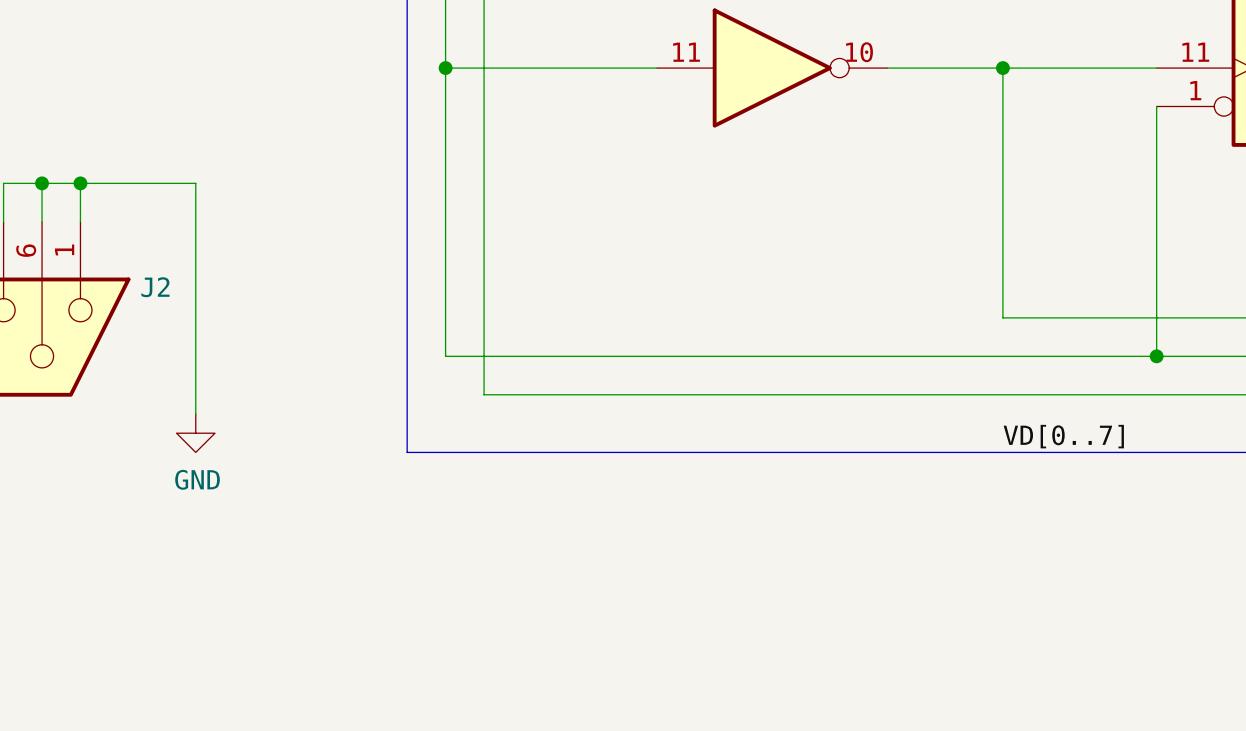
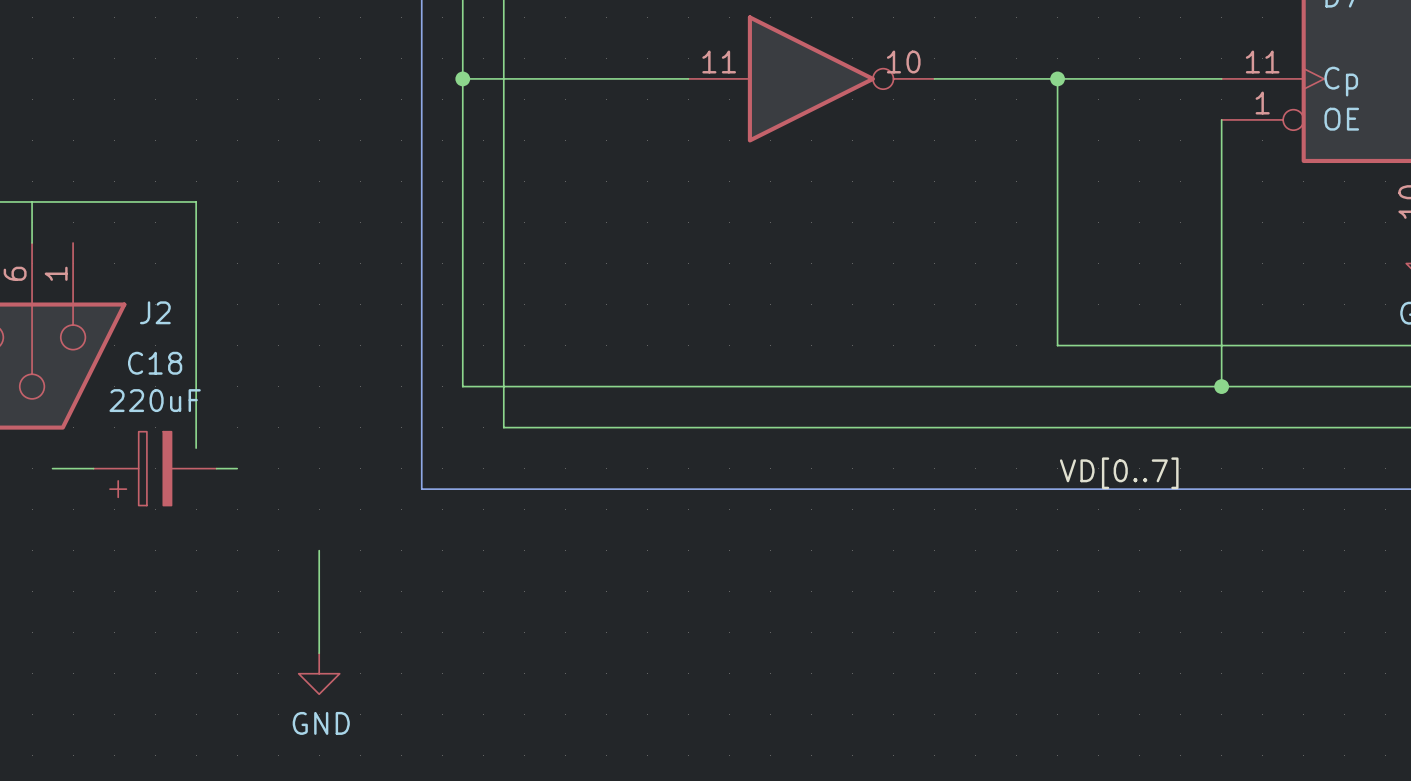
junction: (42, 183) -> none
wire: (80, 183) (80, 221) -> none
junction: (80, 183) -> none
wire: none -> (52, 468) (93, 468)
C18: none -> 220uF (155, 468)
power symbol: GND (195, 433) -> none
wire: none -> (216, 468) (237, 468)
wire: none -> (319, 550) (319, 653)
power symbol: none -> GND (319, 673)

